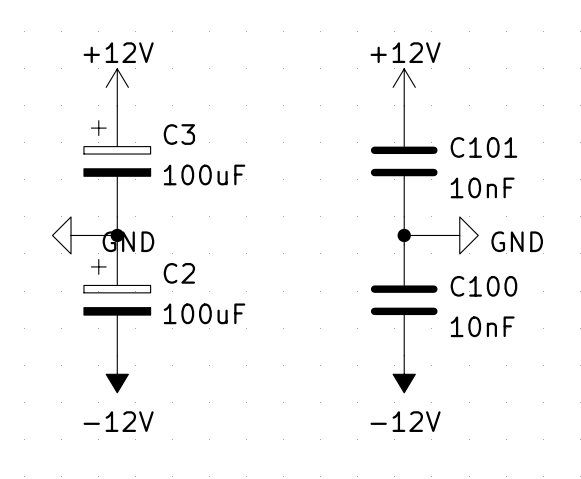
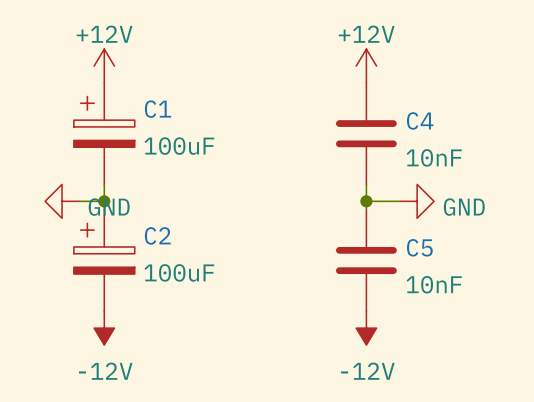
C3 name: C3 (179, 134) -> C1 (158, 109)
C101 name: C101 (483, 147) -> C4 (420, 120)
C100 name: C100 (483, 286) -> C5 (419, 247)

